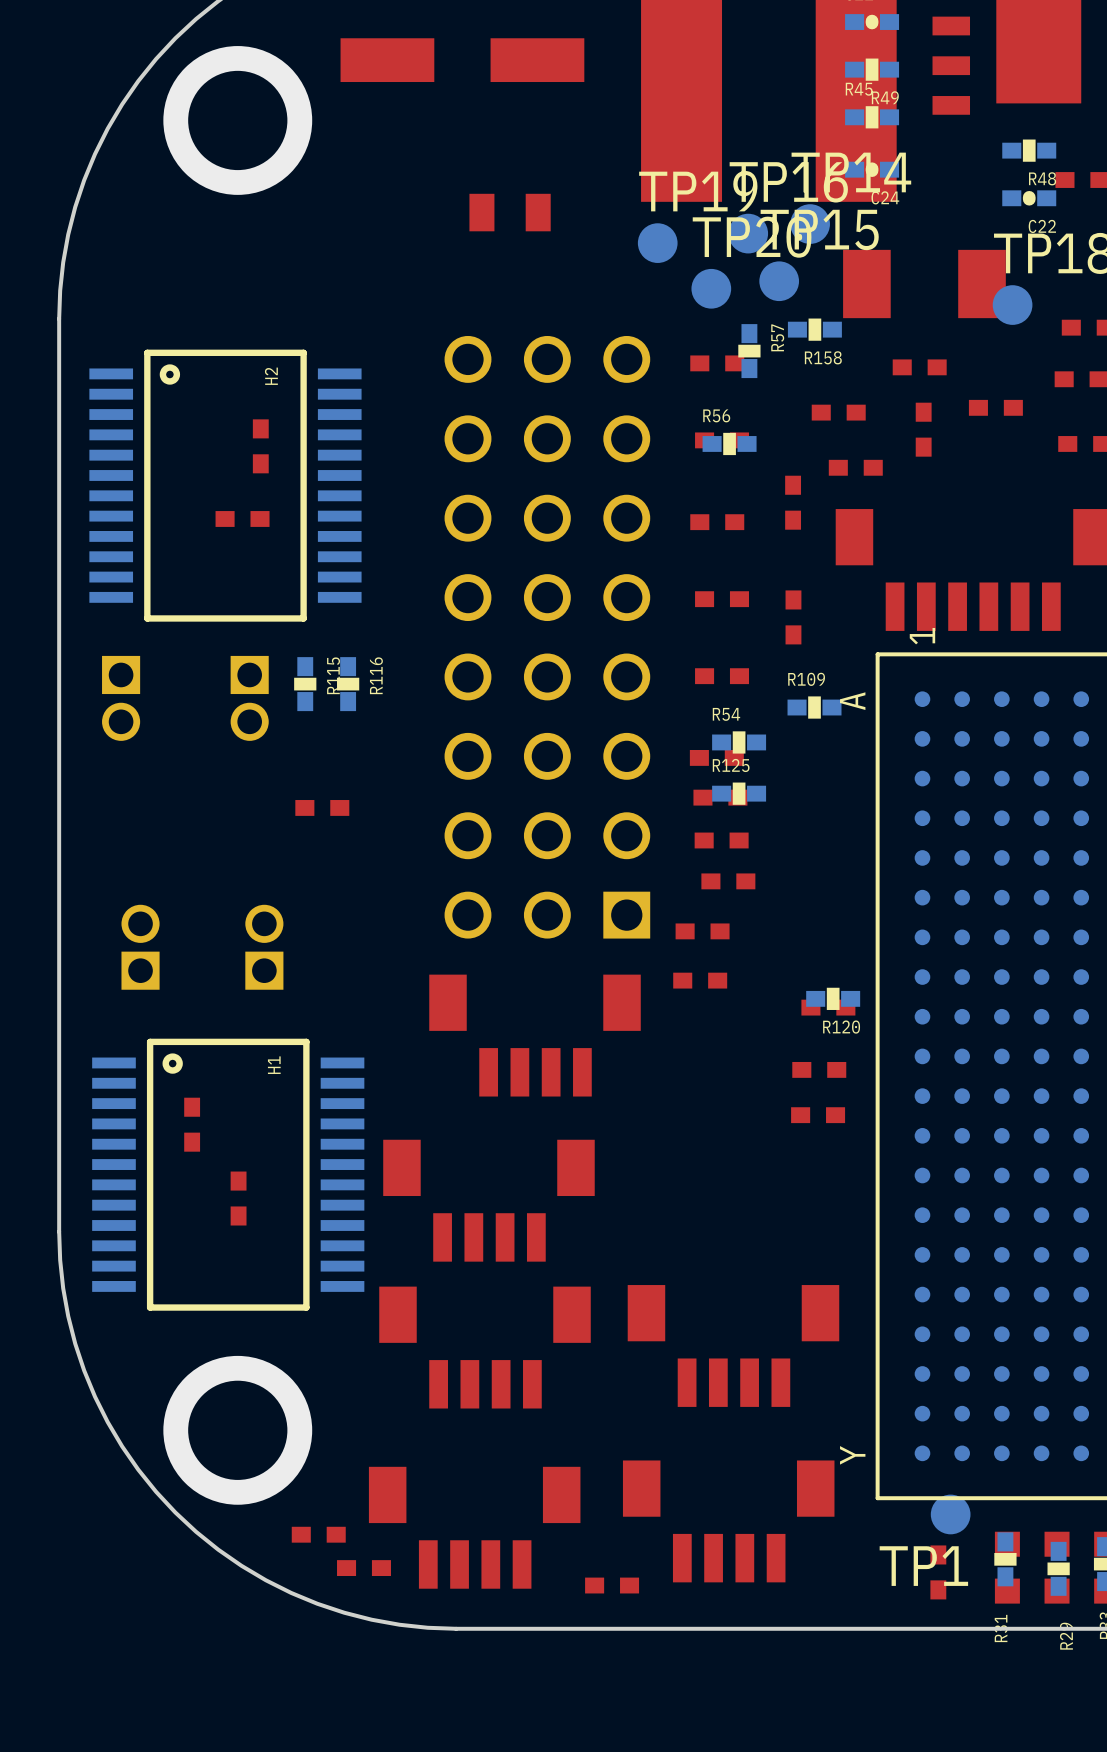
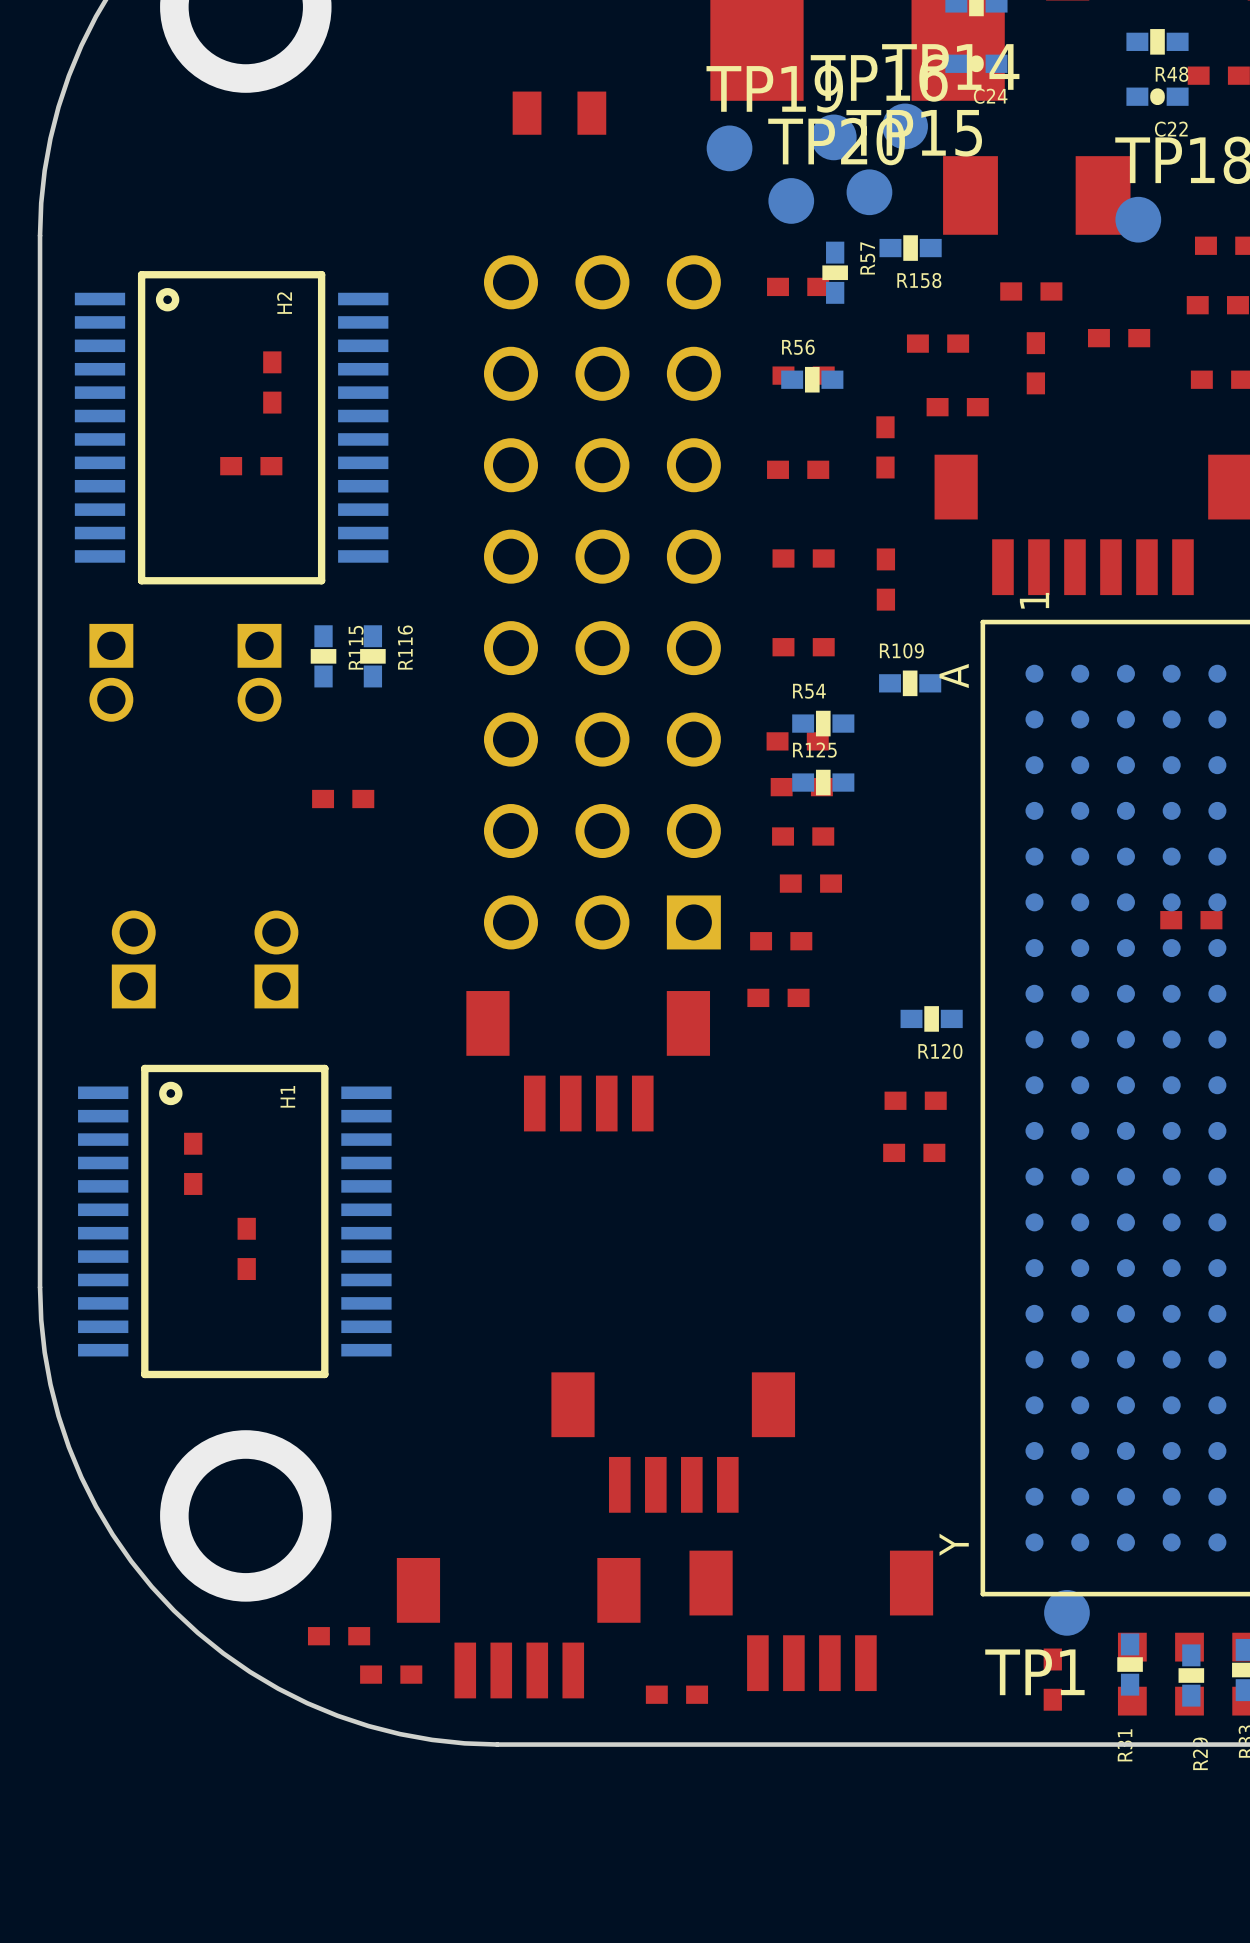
part position: (828, 1007) -> (1191, 920)
part: (488, 1200) -> none
part: (733, 1345) -> none
part: (485, 1347) -> none
part: none -> (673, 1442)

